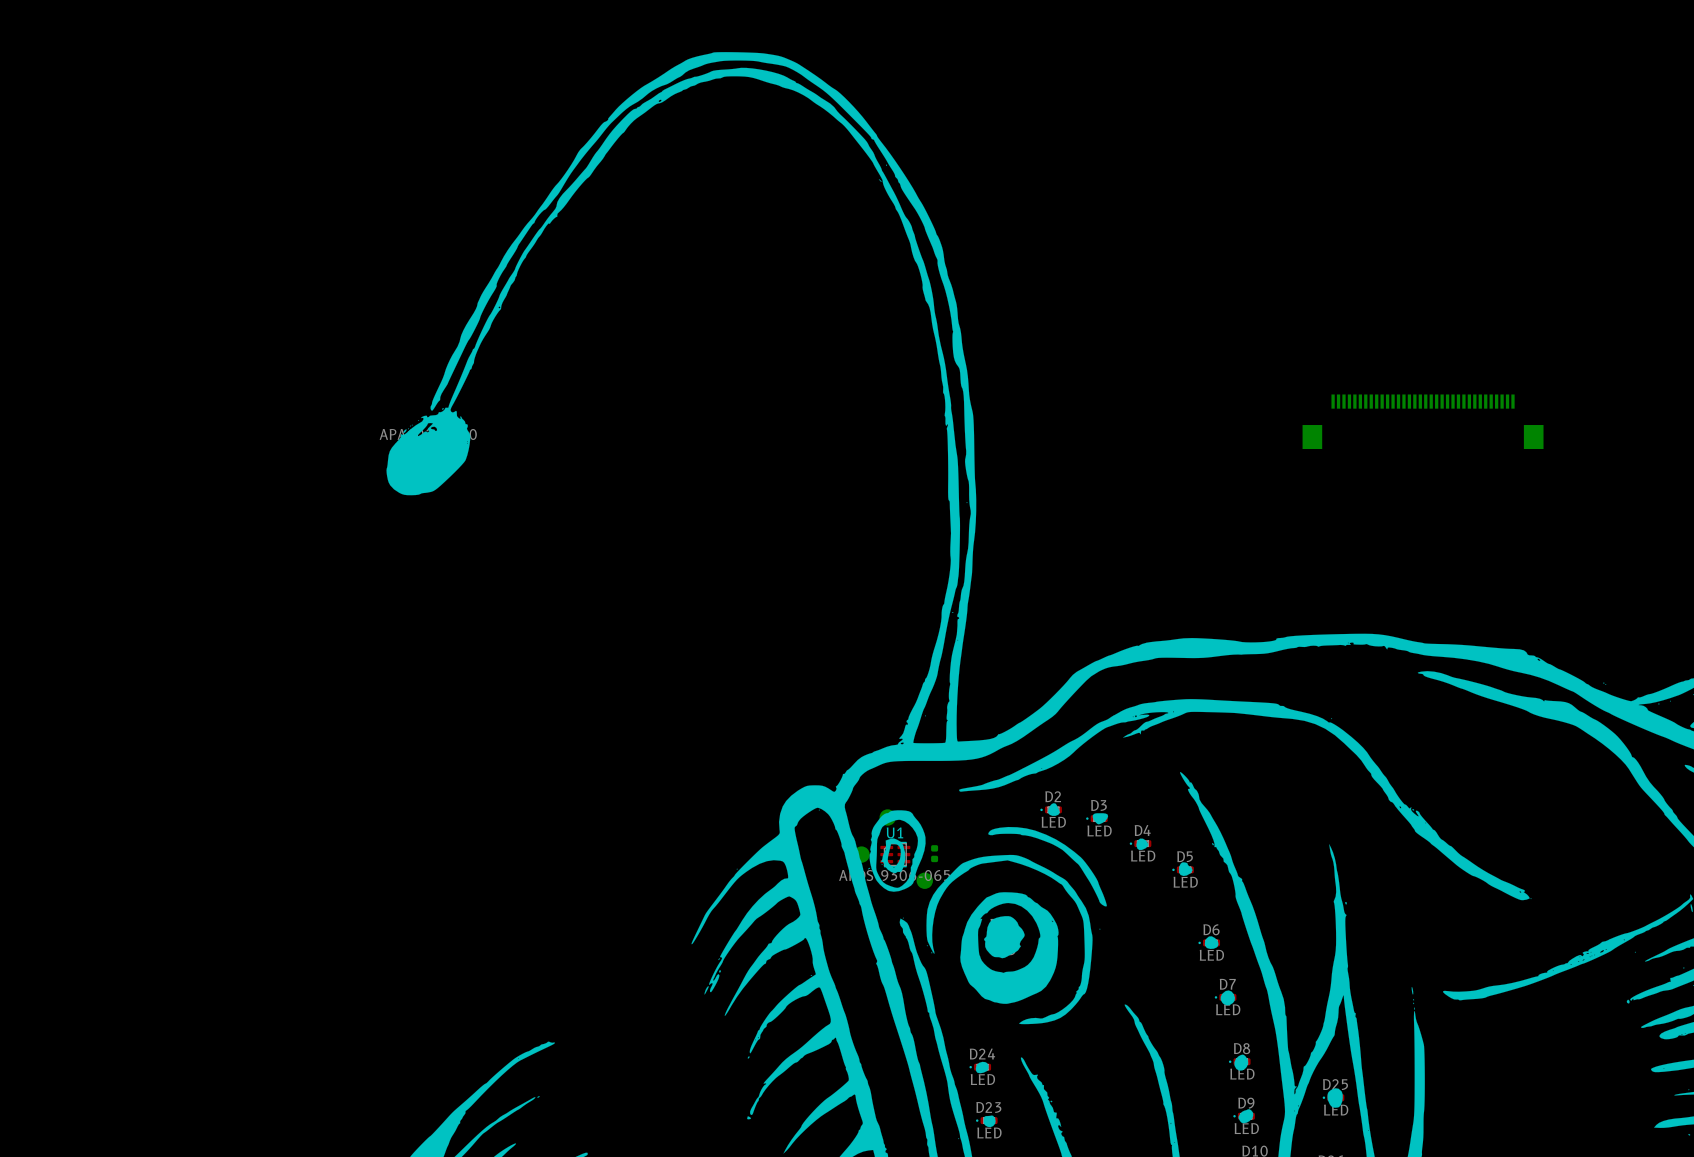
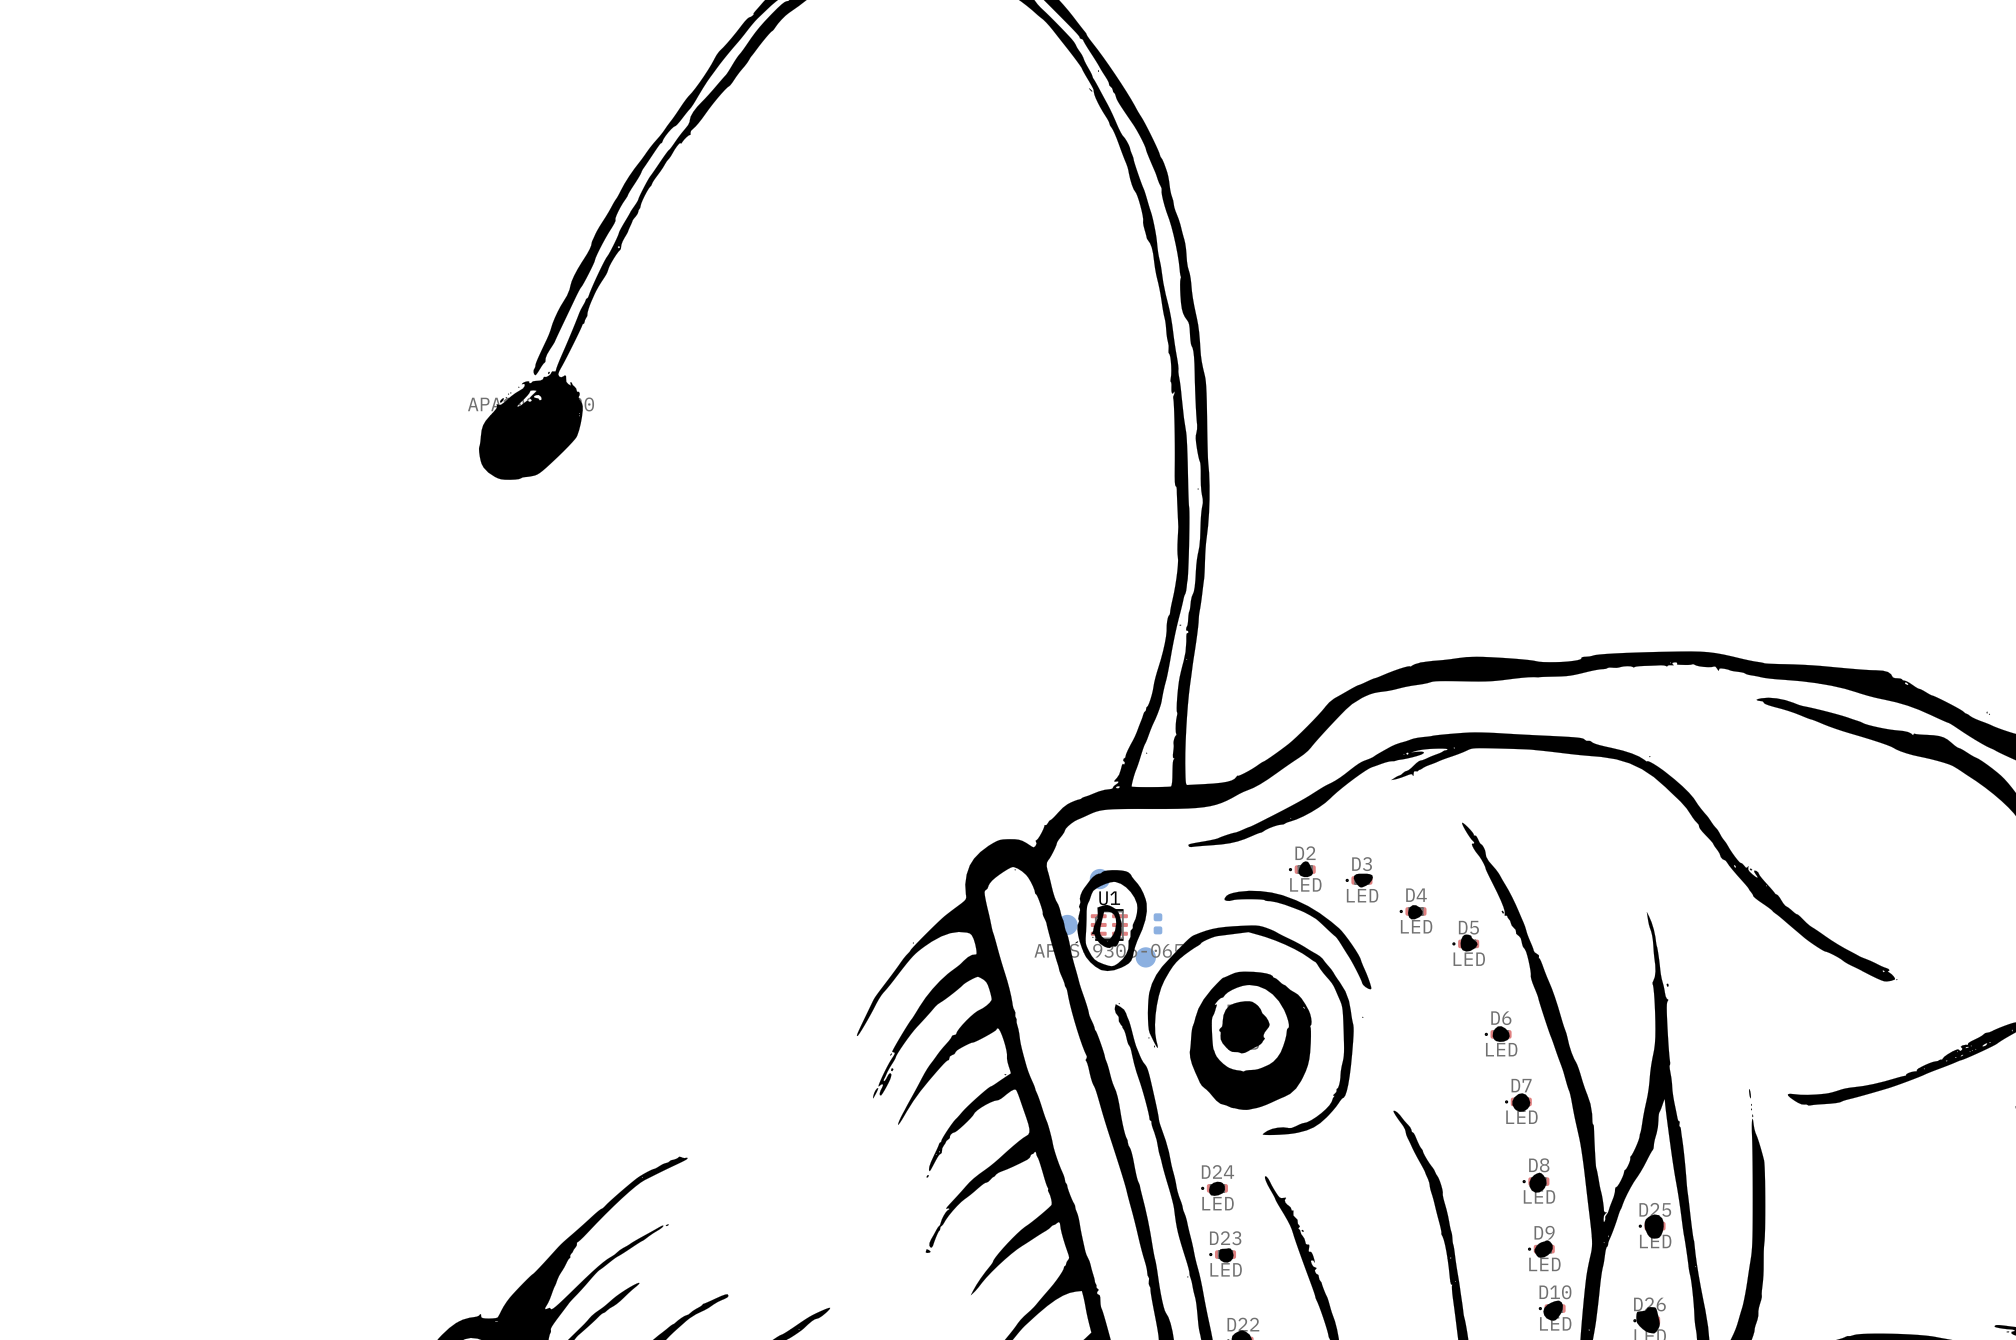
part: (1423, 421) -> none

